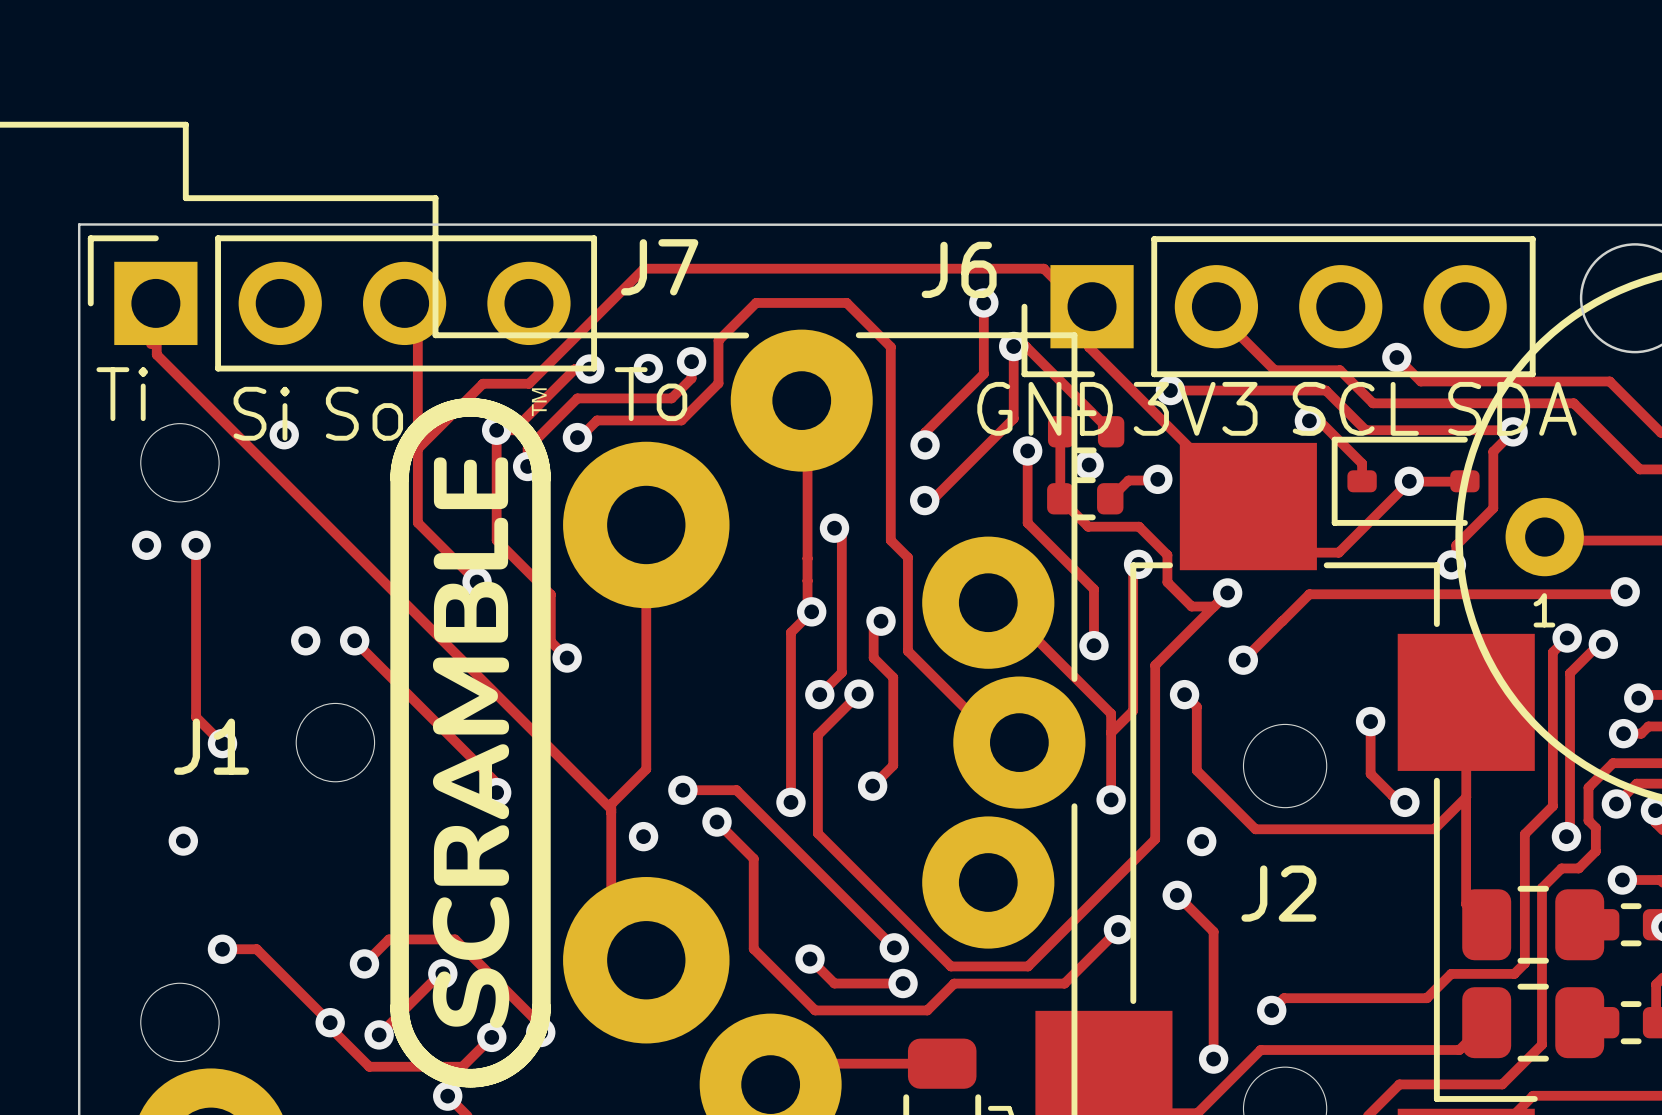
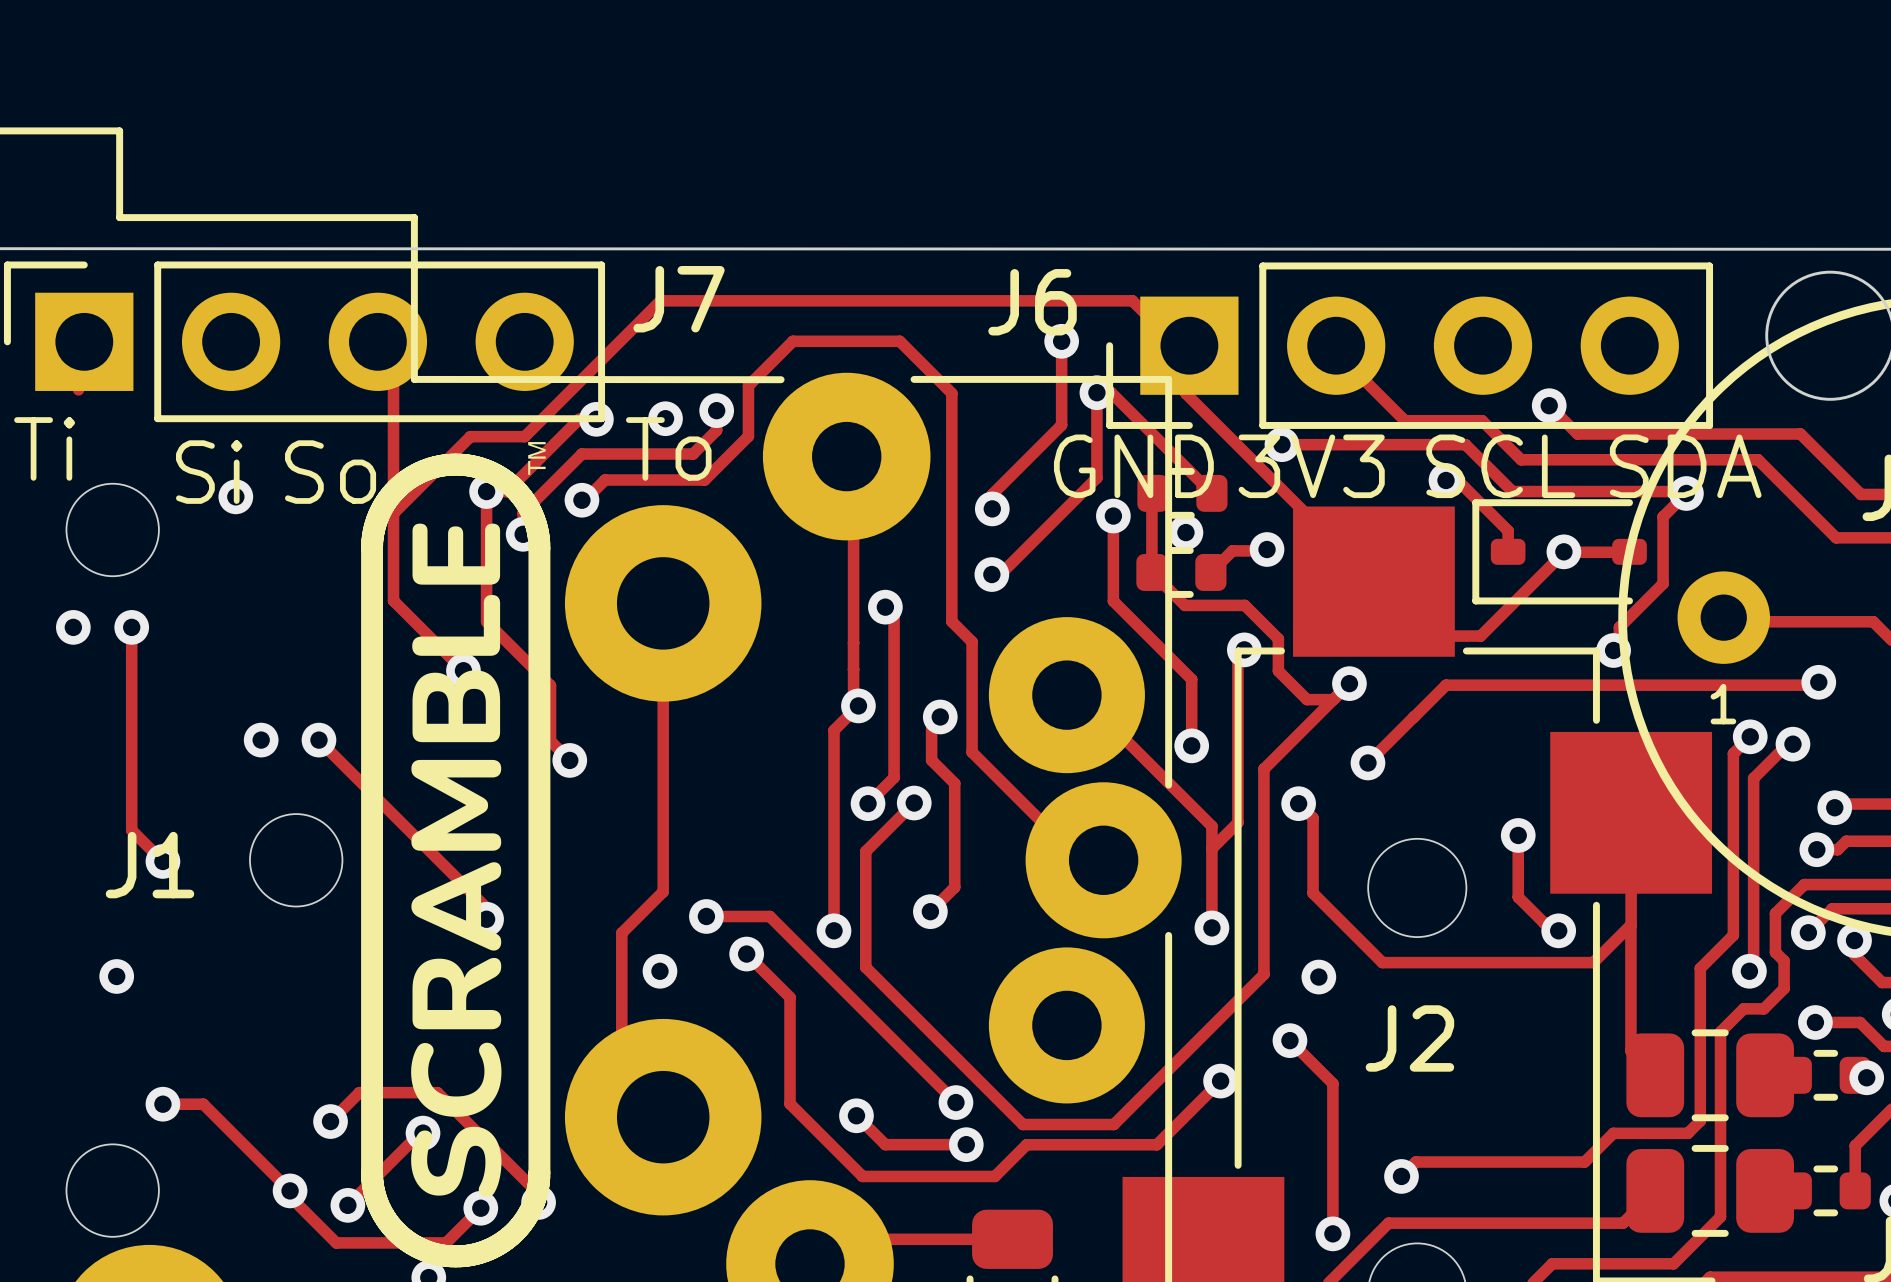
track: (156, 306) (156, 354) (611, 809) -> none

